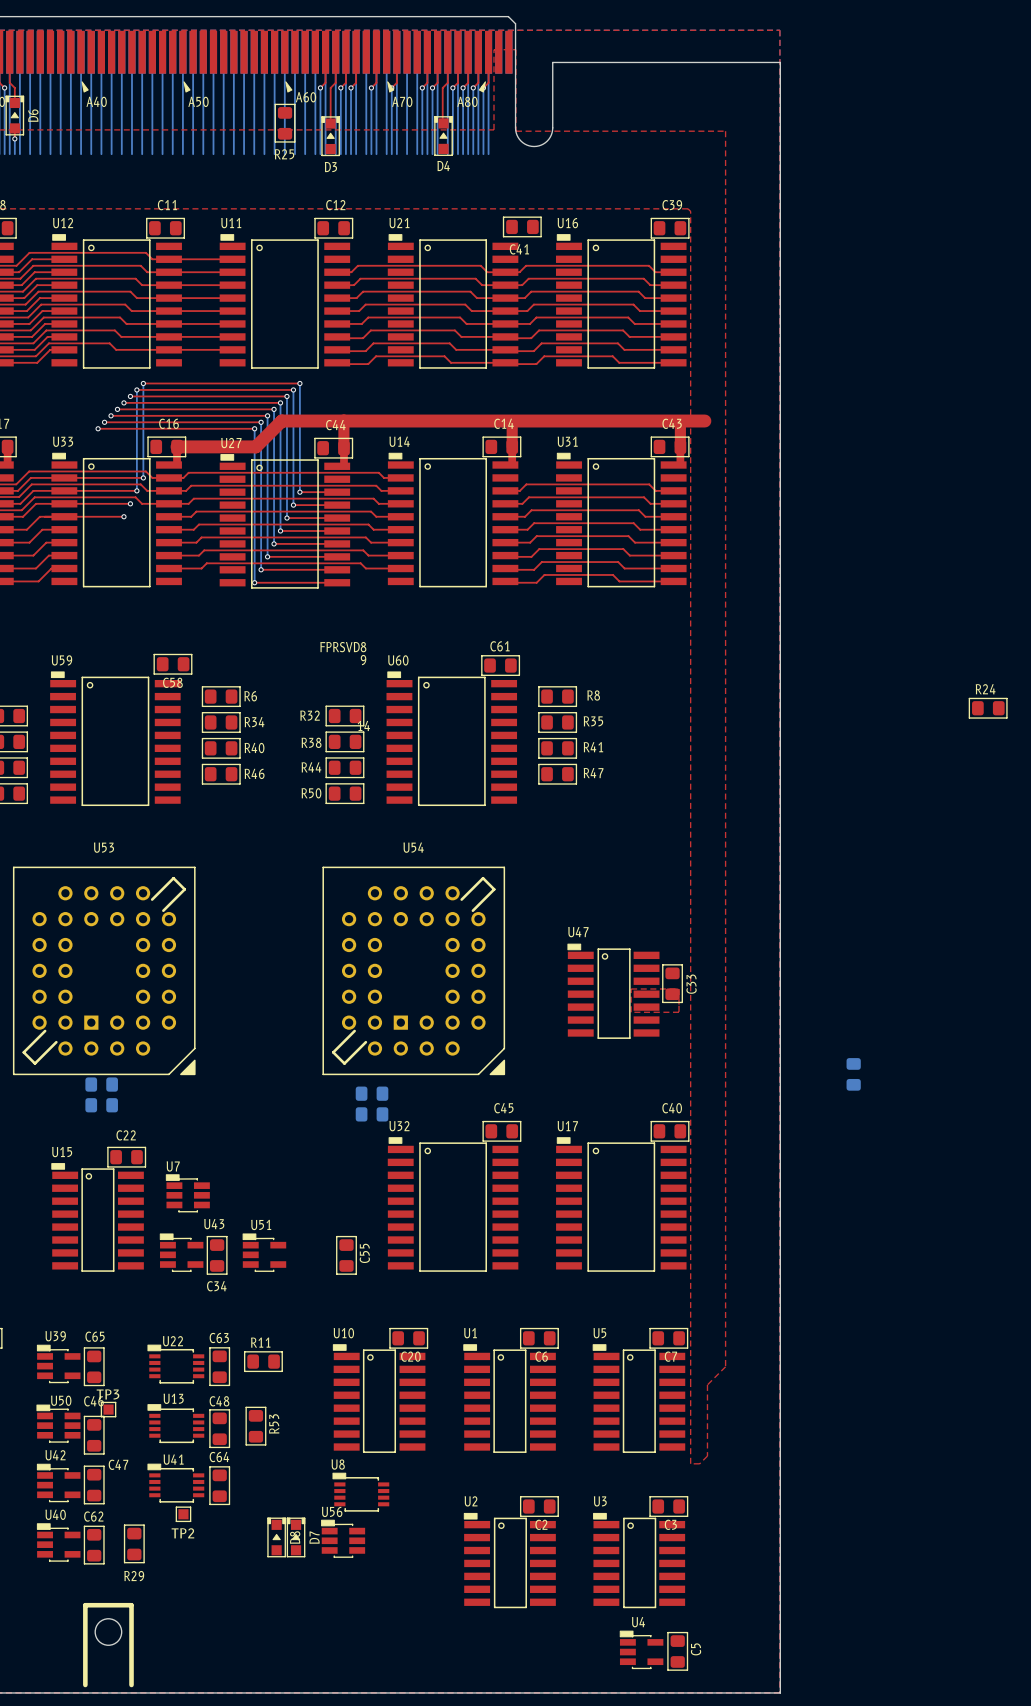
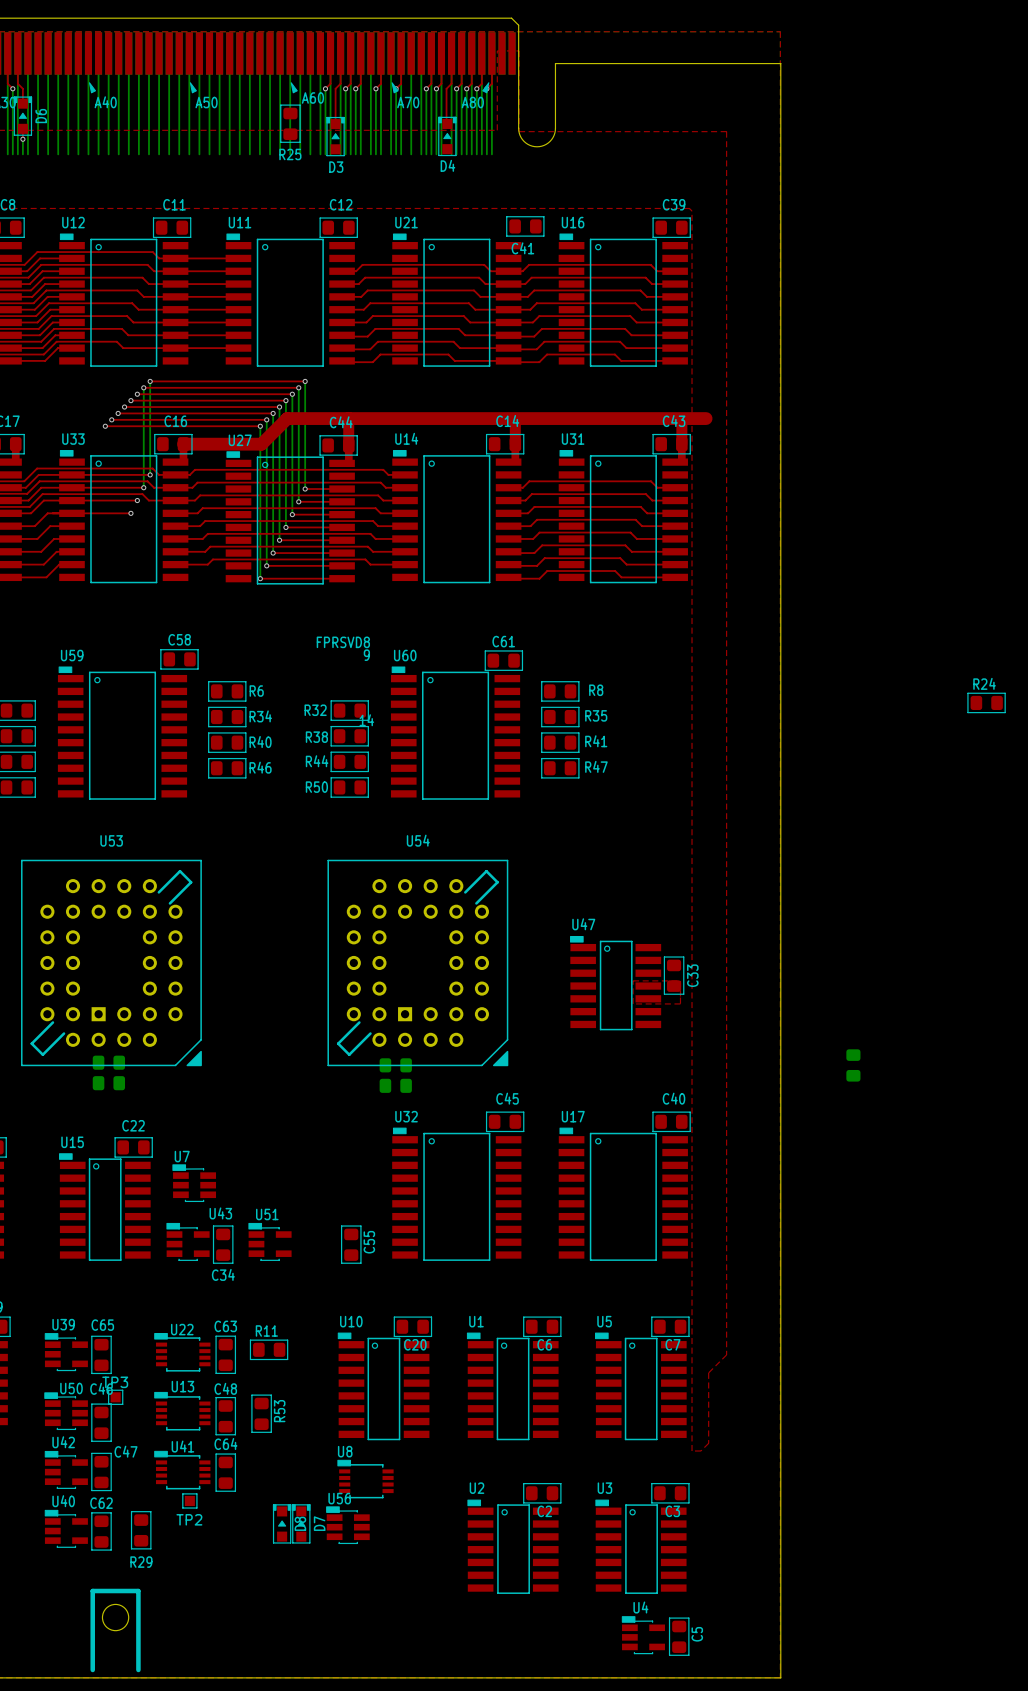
C58 name position: C58 (172, 682) -> C58 (179, 639)
part: none -> (108, 1062)
part: none -> (395, 1065)
part: (101, 1084) -> none
part: none -> (108, 1083)
part: (372, 1093) -> none
part: none -> (395, 1085)
part: (101, 1105) -> none
part: (372, 1114) -> none

